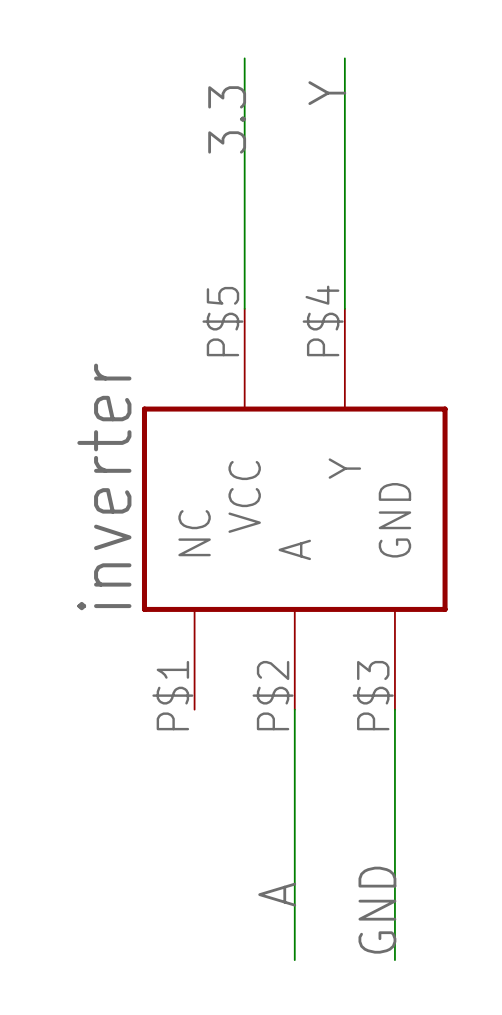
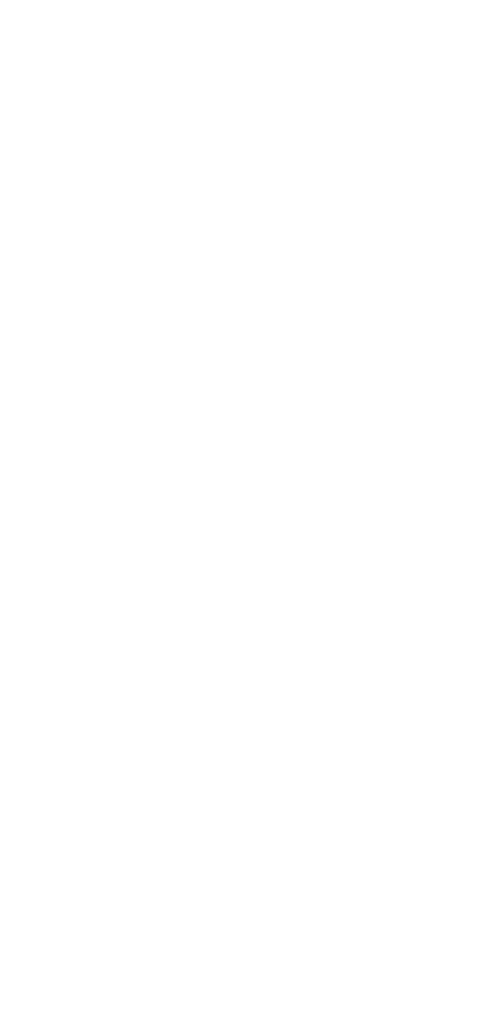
wire: (244, 58) (244, 308) -> none
wire: (344, 58) (344, 308) -> none
label: Y (327, 93) -> none
label: 3.3 (227, 119) -> none
part: (294, 509) -> none
wire: (294, 709) (294, 960) -> none
wire: (394, 709) (394, 960) -> none
label: A (277, 894) -> none
label: GND (377, 910) -> none

